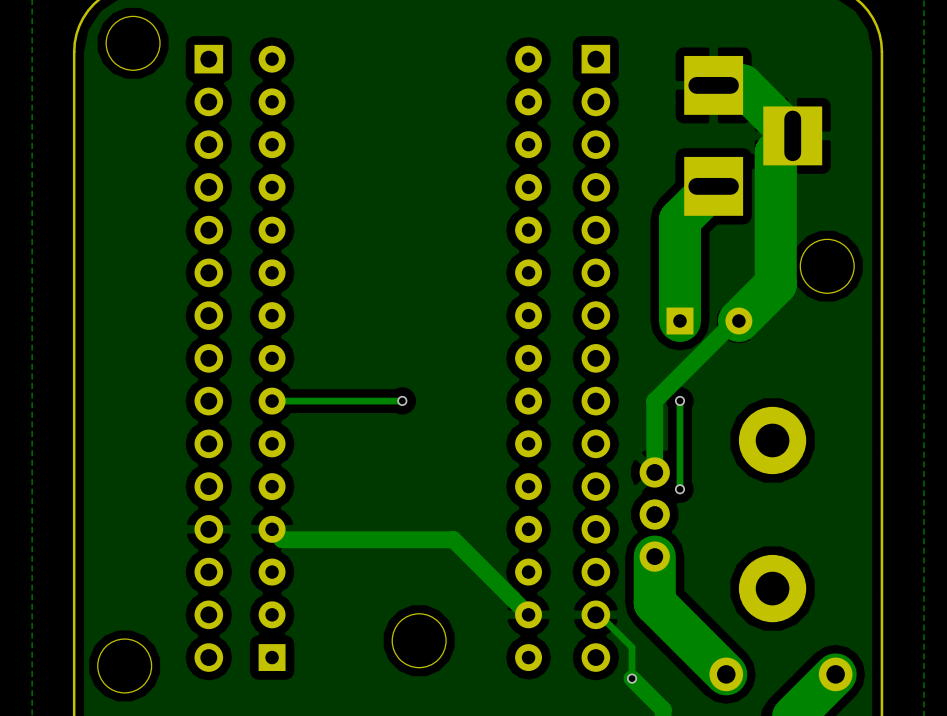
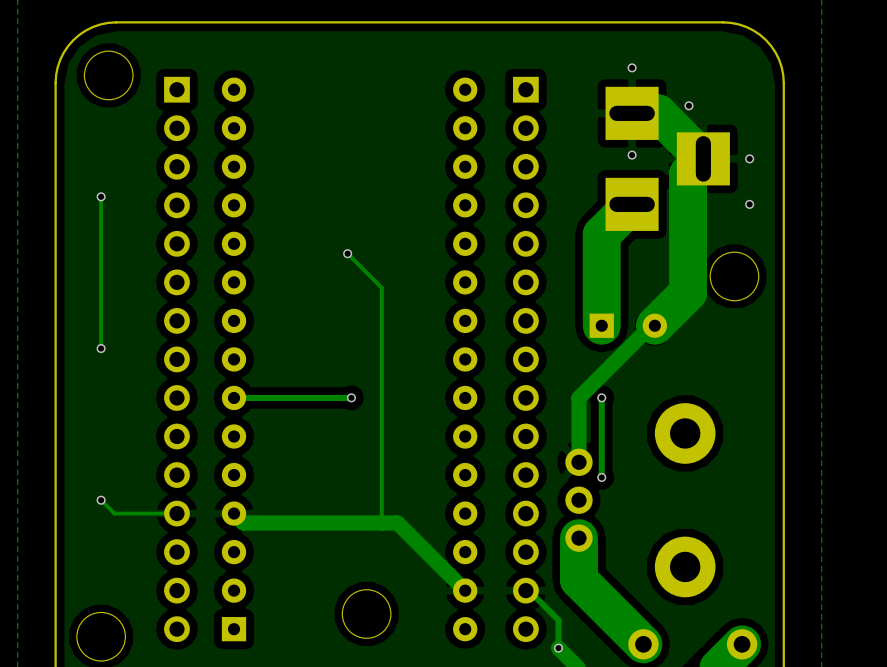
via: none -> (632, 67)
via: none -> (688, 105)
via: none -> (632, 155)
via: none -> (749, 158)
track: none -> (101, 196) (101, 348)
via: none -> (101, 196)
via: none -> (749, 204)
track: none -> (347, 253) (381, 287) (381, 522)
via: none -> (347, 253)
via: none -> (101, 348)
track: none -> (101, 500) (114, 513) (176, 513)
via: none -> (101, 500)

